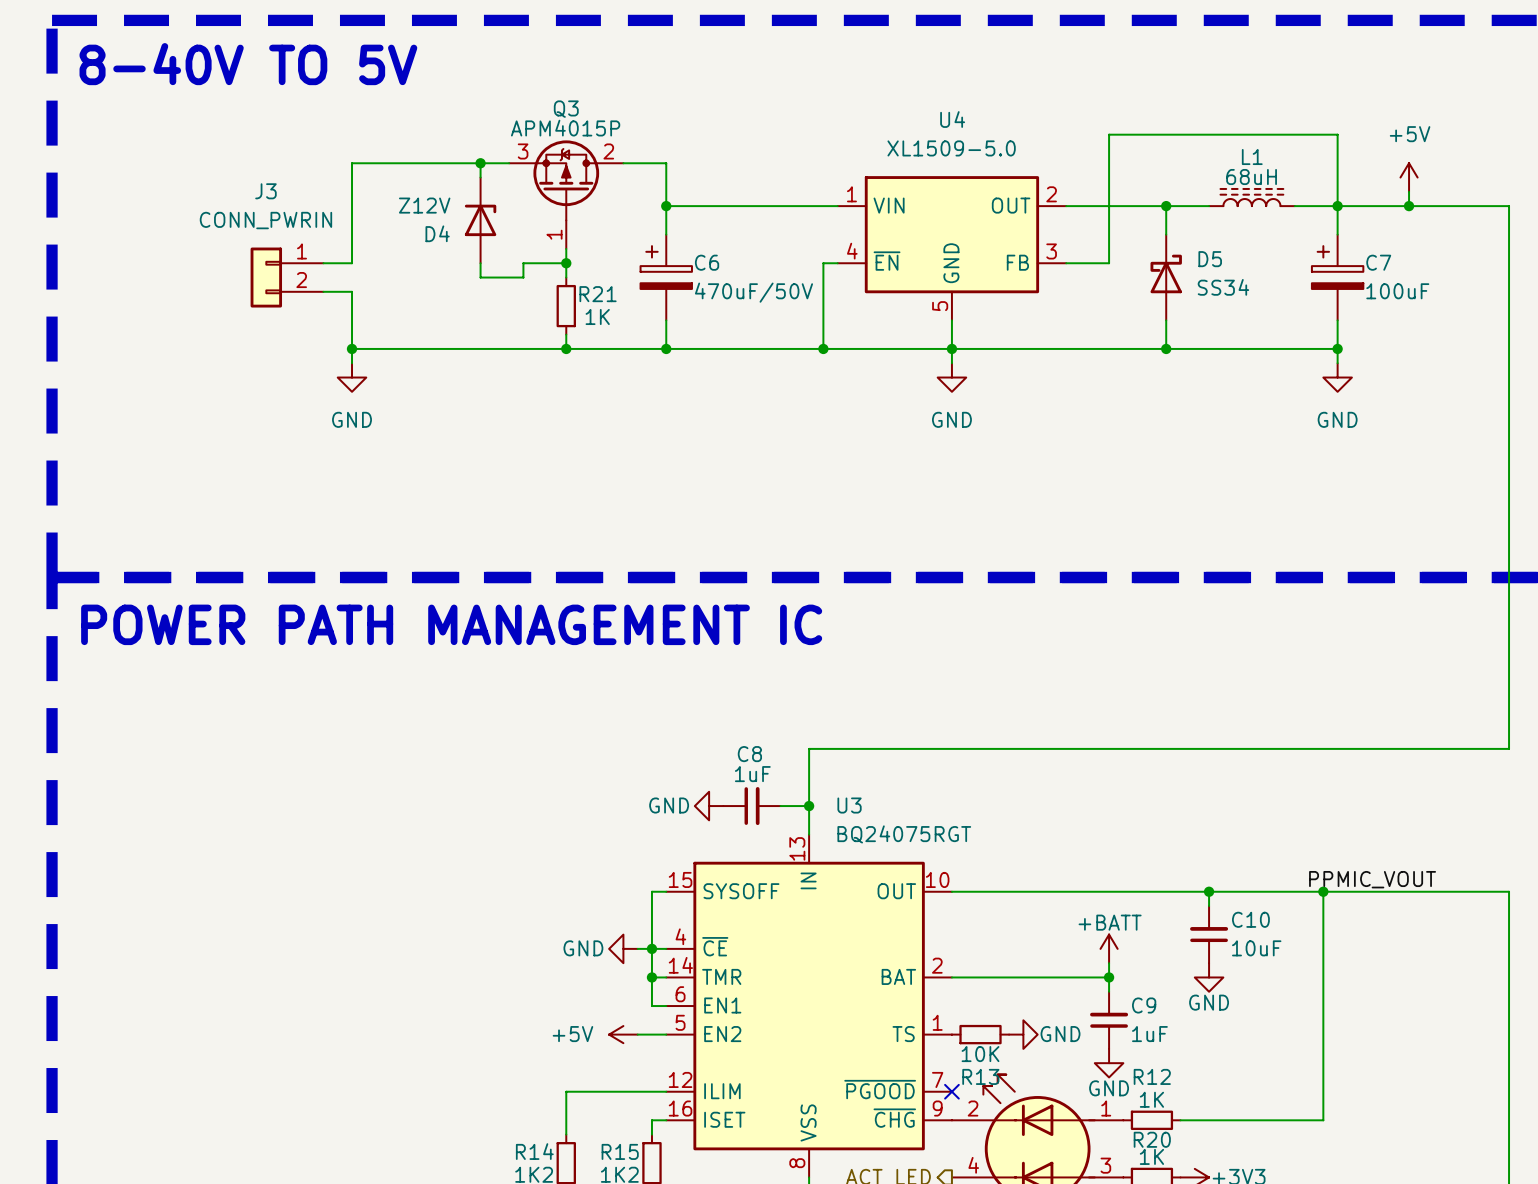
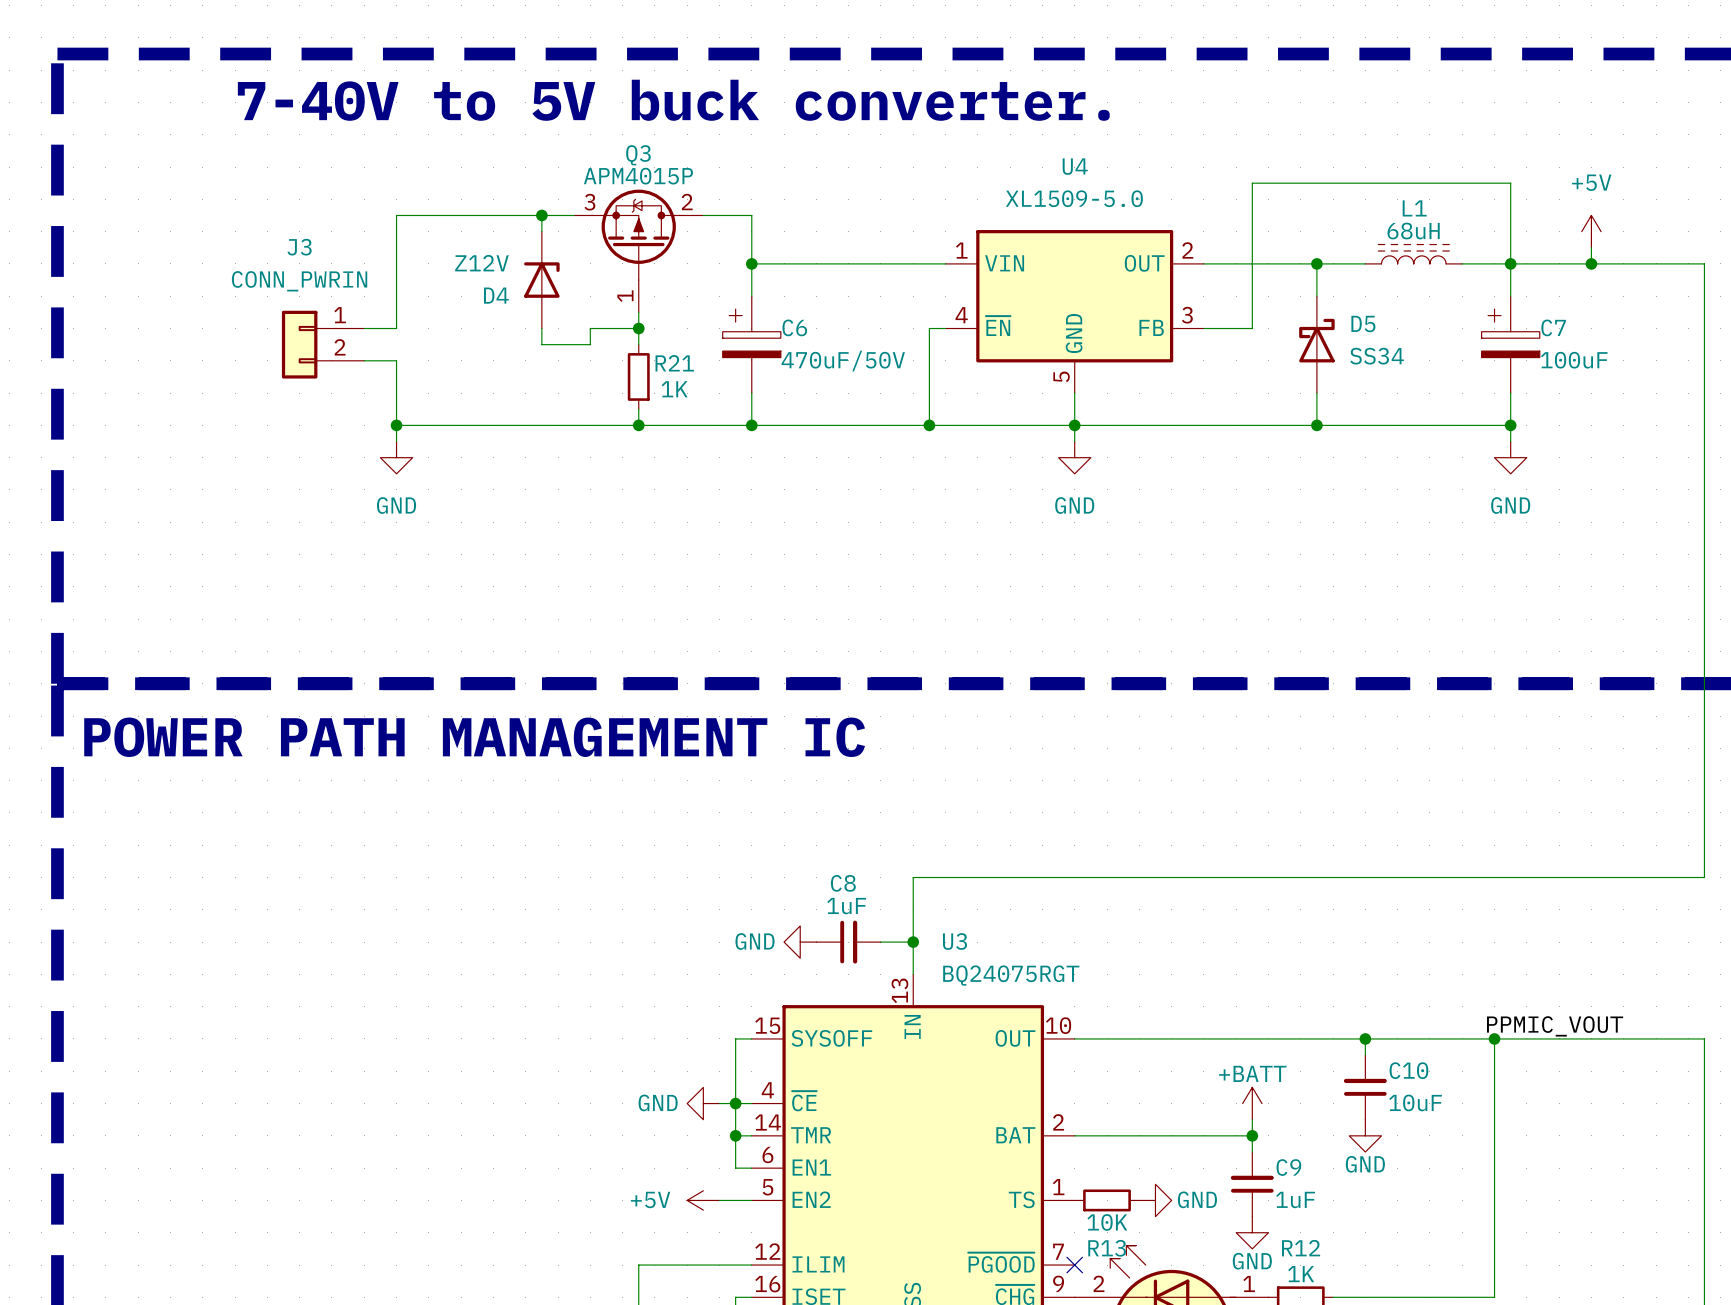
text: none -> 7-40V to 5V buck converter. (673, 100)
text: 8-40V TO 5V (248, 64) -> none

